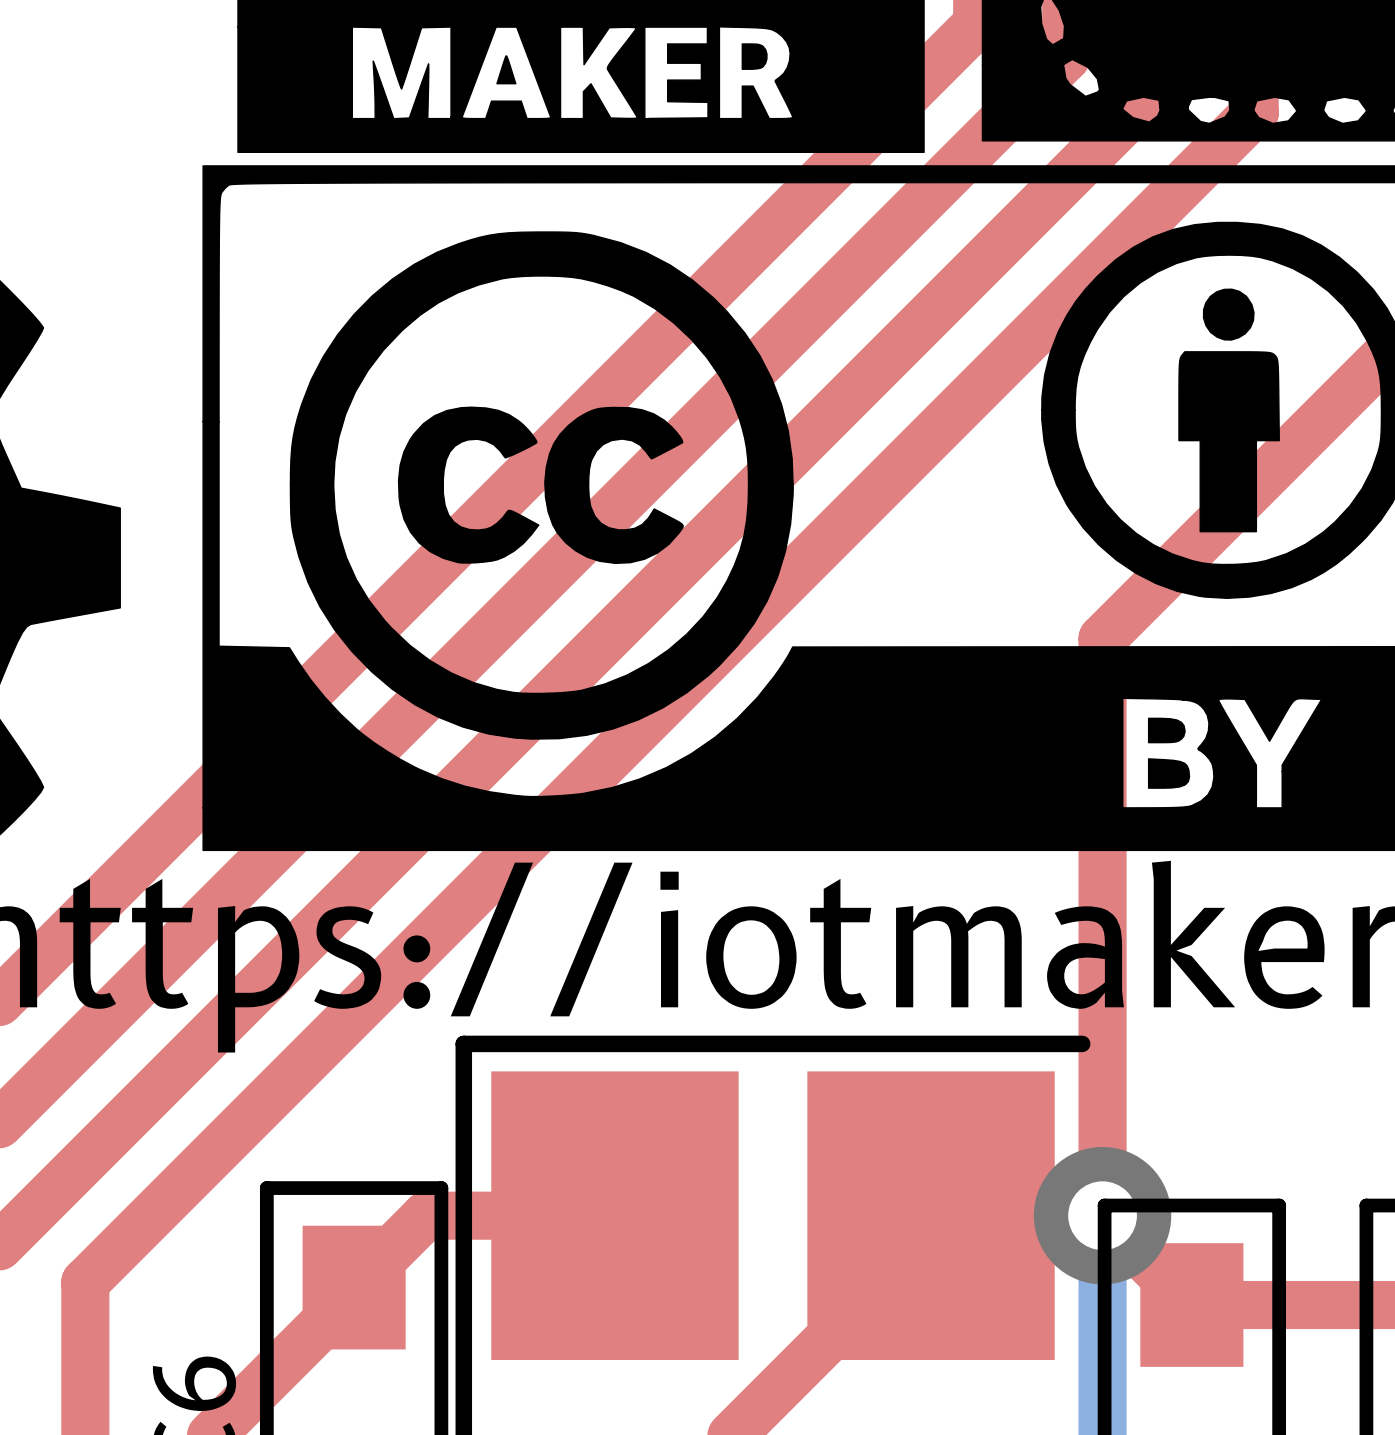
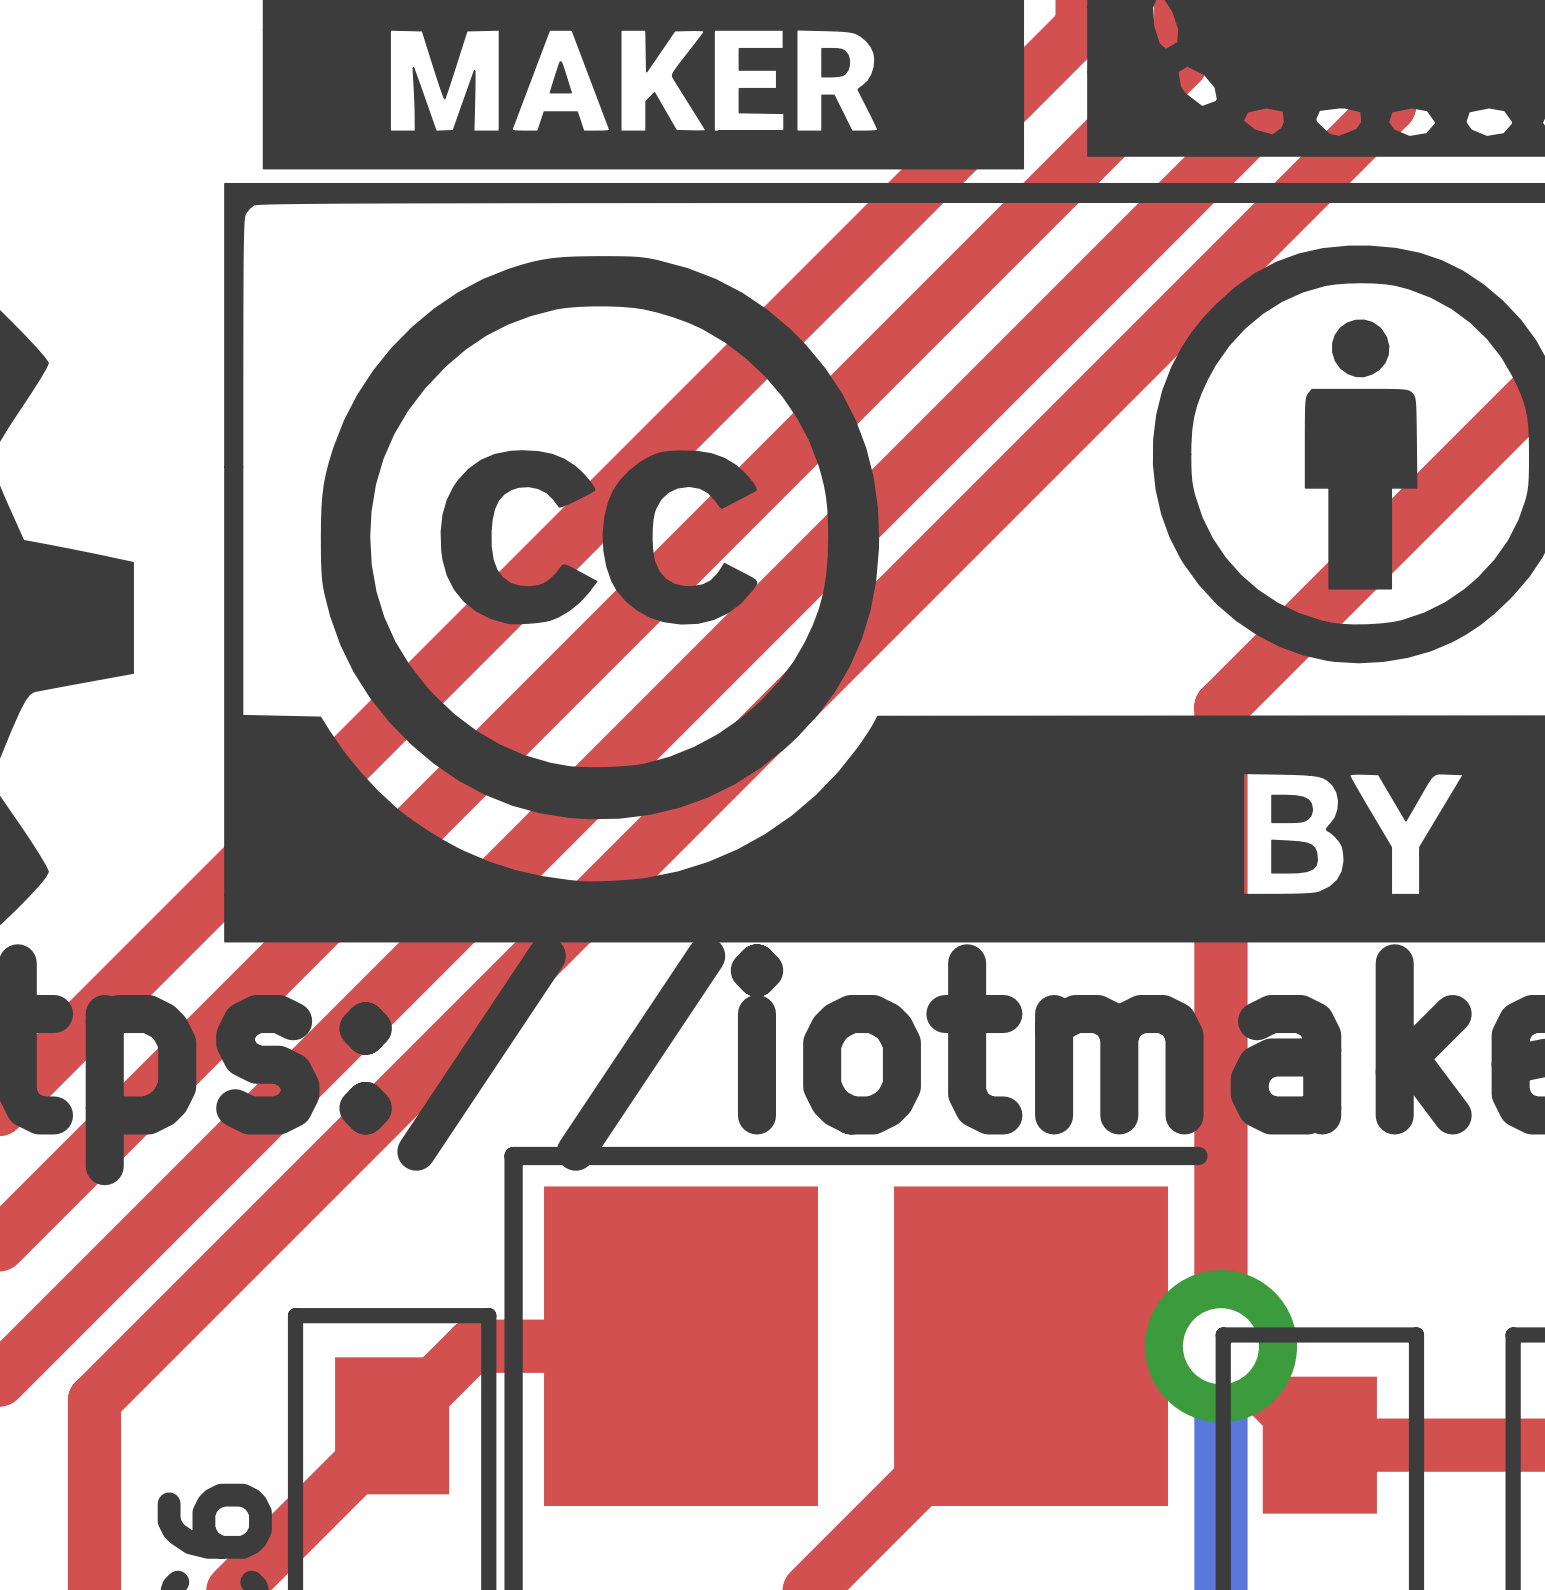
top track: (1254, 95) (1254, 112) (85, 1282) -> (1389, 105) (94, 1400) (94, 1420)

